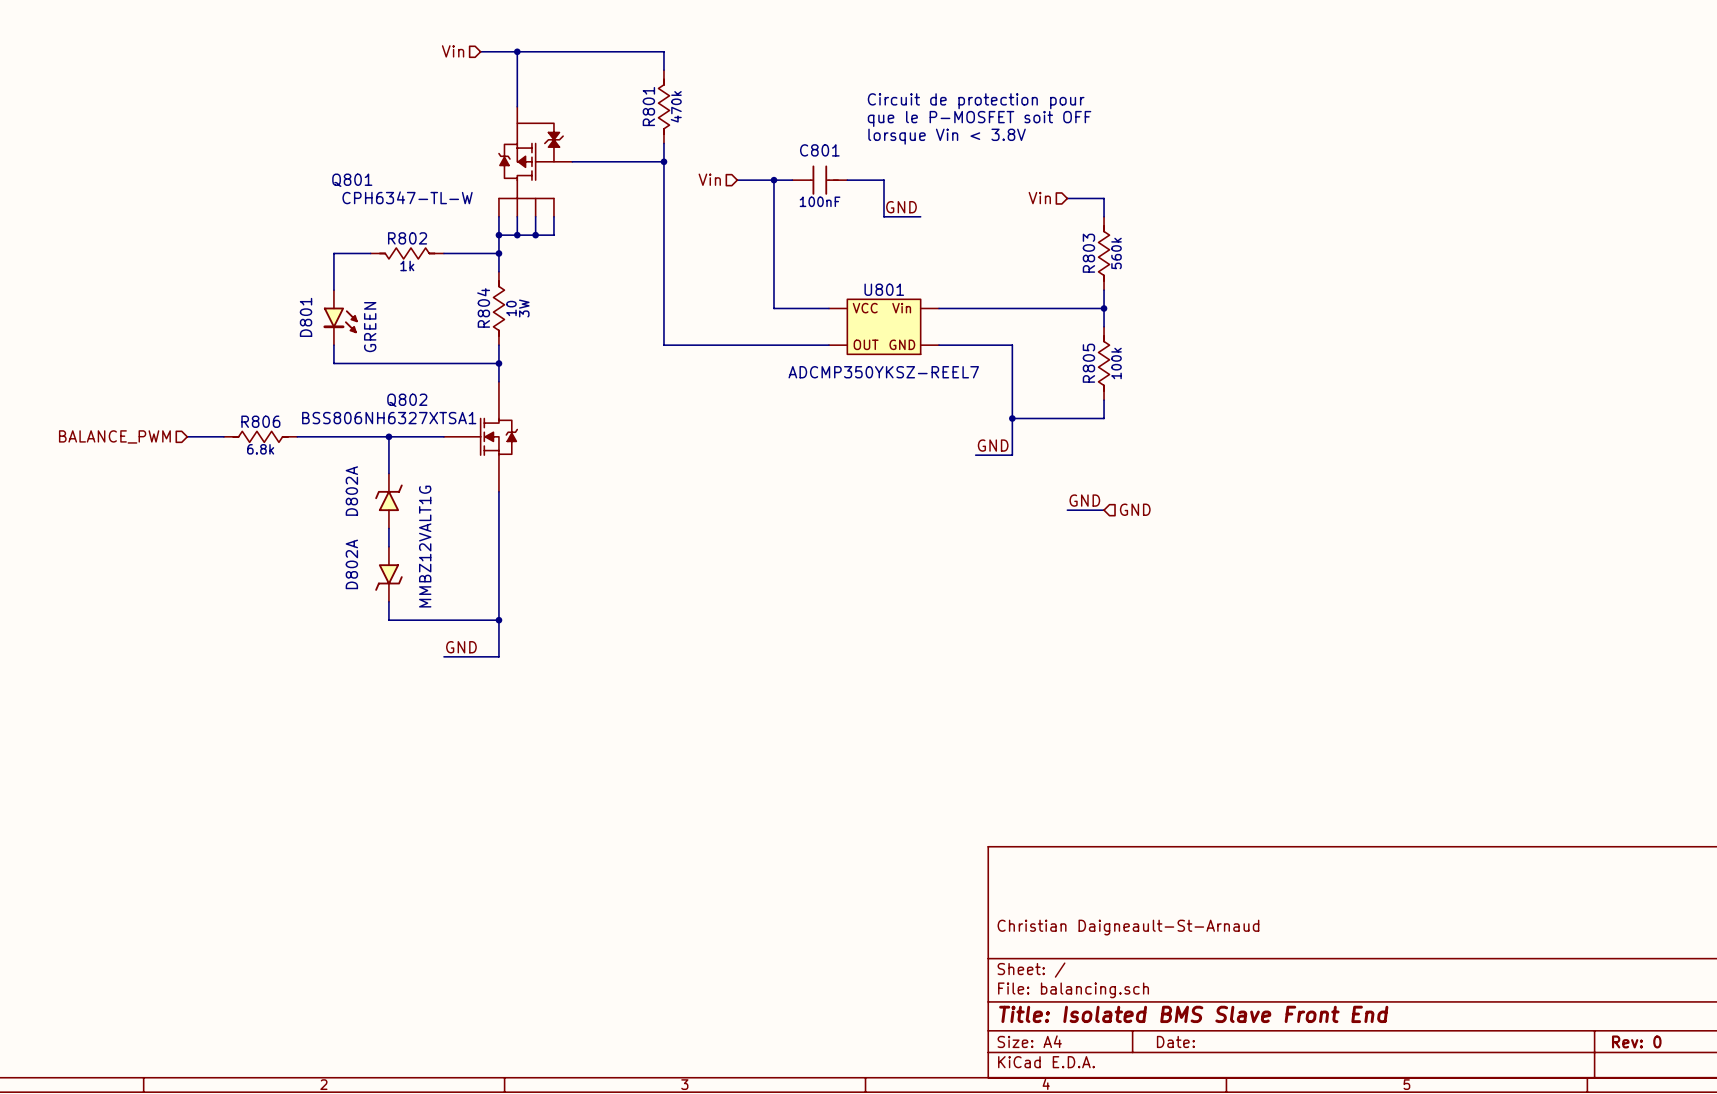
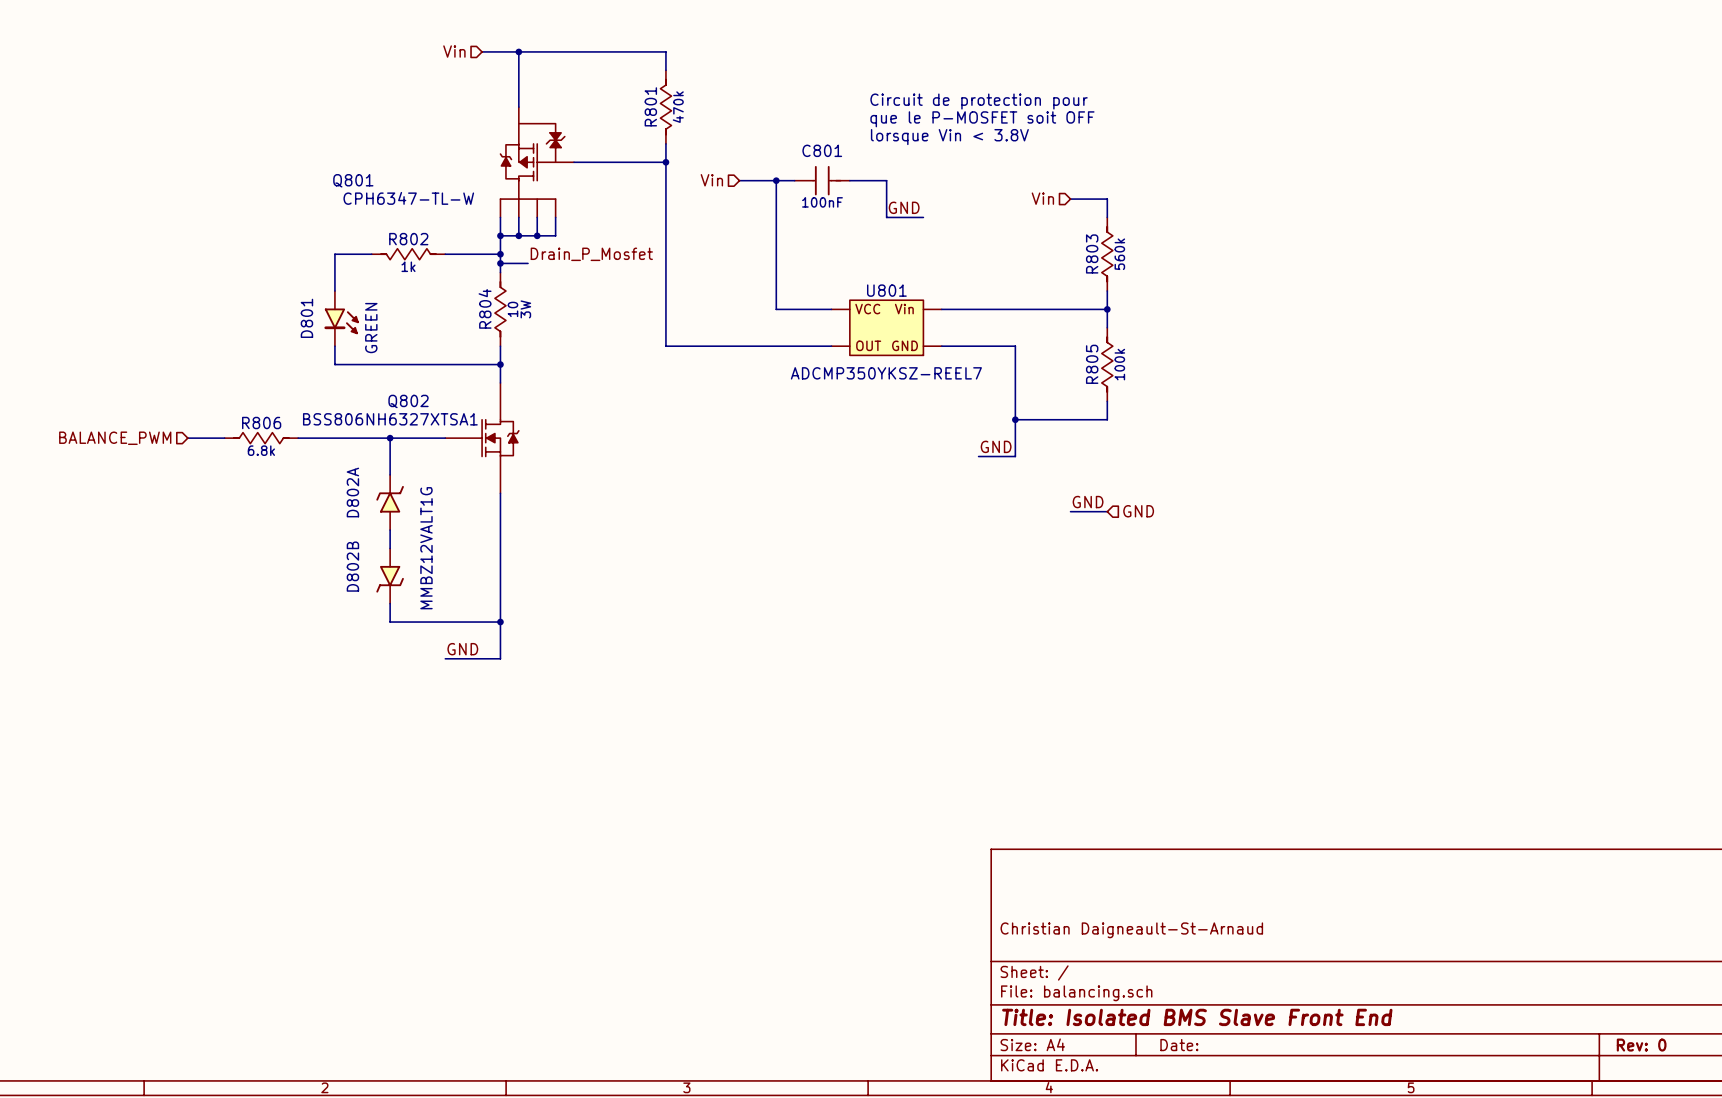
label: none -> Drain_P_Mosfet (591, 254)
wire: none -> (500, 263) (528, 263)
junction: none -> (500, 263)
D802A name: D802A (351, 564) -> D802B (352, 566)

